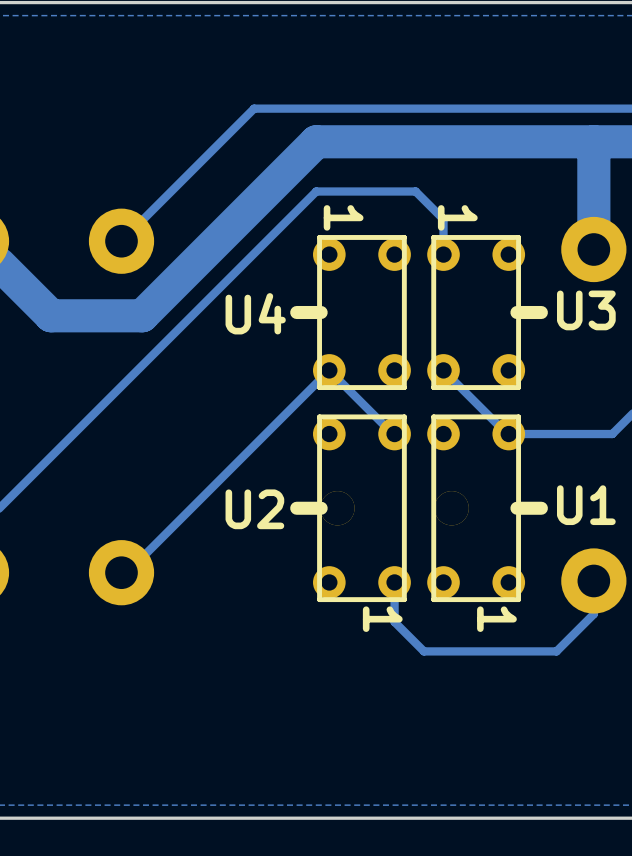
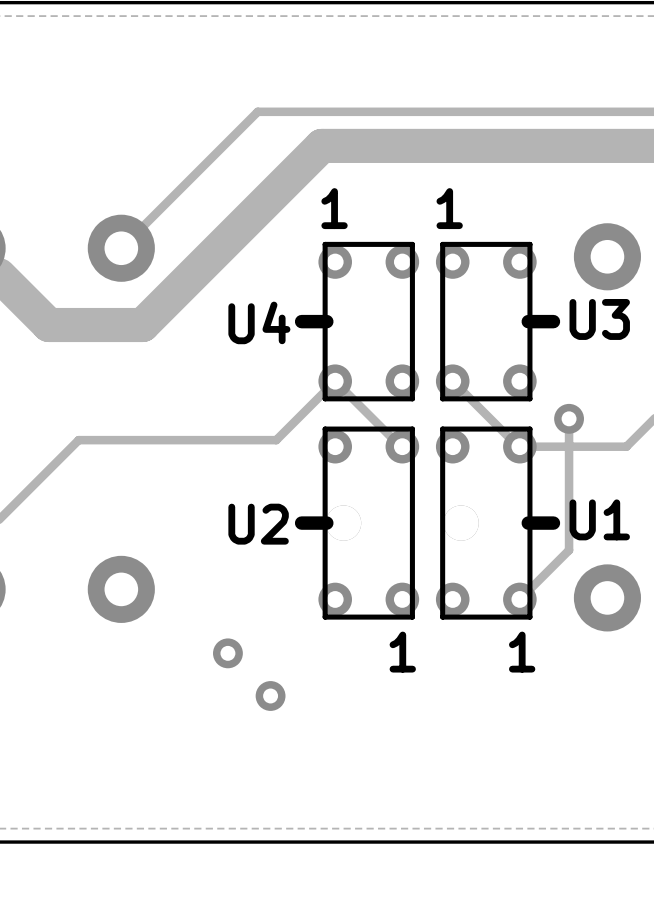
track: (593, 141) (593, 249) -> none
U4 text rotation: 0° (343, 217) -> 90° counterclockwise (334, 208)
U3 text rotation: 0° (457, 217) -> 90° counterclockwise (449, 208)
track: (443, 254) (443, 219) (415, 191) (316, 191) (80, 427) -> none
track: none -> (569, 418) (569, 550) (519, 599)
via: none -> (569, 418)
track: (272, 427) (127, 572) (121, 572) -> (276, 440) (78, 440)
track: (593, 580) (593, 614) (556, 651) (423, 651) (394, 622) (394, 582) -> none
U2 text rotation: 0° (382, 619) -> 90° counterclockwise (402, 652)
U1 text rotation: 0° (496, 619) -> 90° counterclockwise (522, 652)
via: none -> (227, 653)
via: none -> (270, 695)

